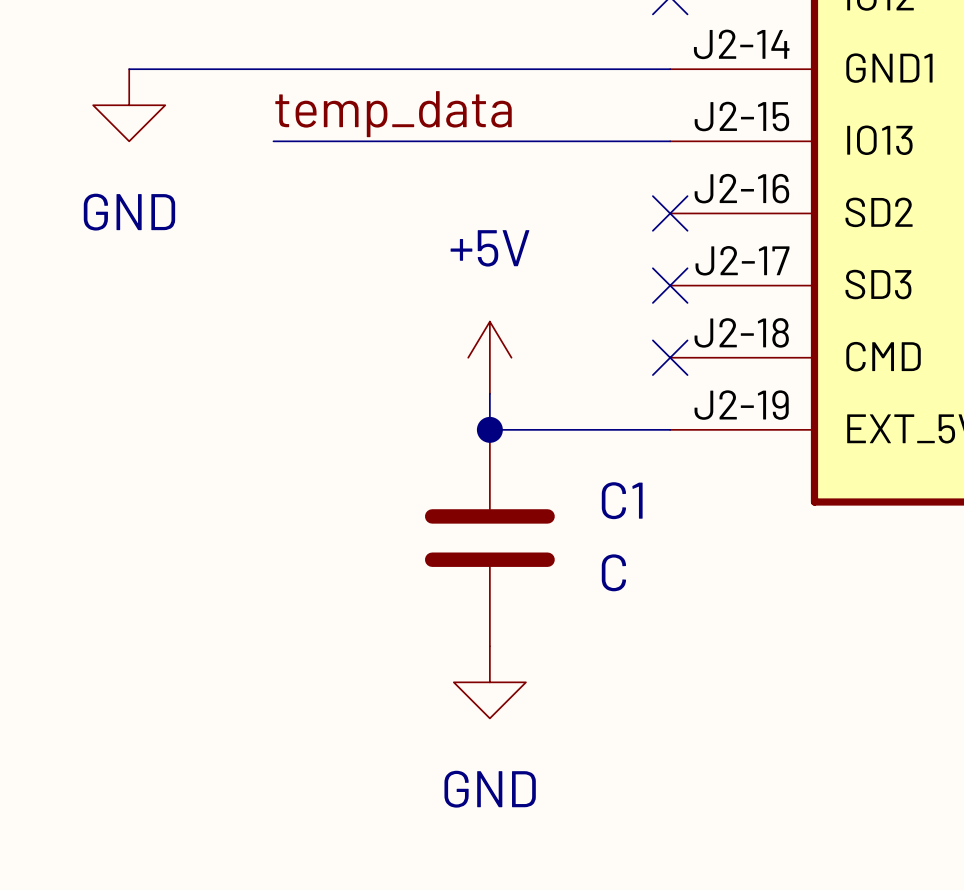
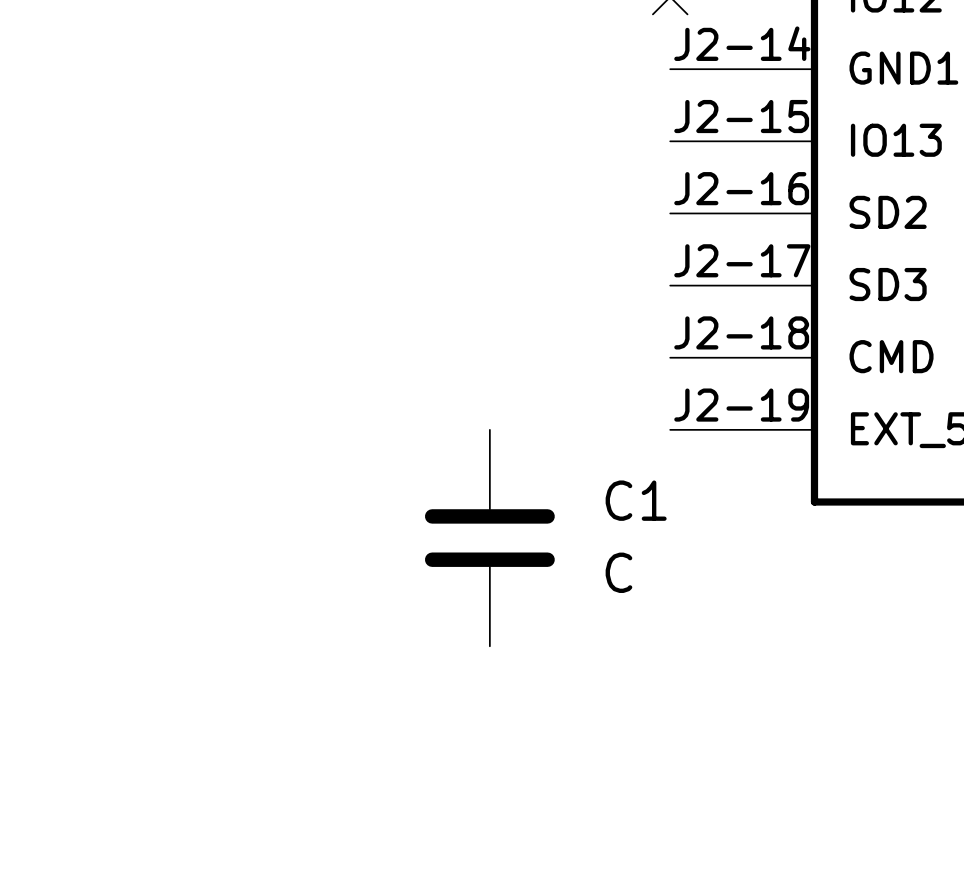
wire: (129, 69) (670, 69) -> none
power symbol: GND (129, 105) -> none
label: temp_data (393, 114) -> none
wire: (273, 141) (670, 141) -> none
no-connect mark: (670, 213) -> none
no-connect mark: (670, 285) -> none
power symbol: +5V (489, 357) -> none
no-connect mark: (670, 357) -> none
wire: (489, 393) (489, 429) (670, 429) -> none
junction: (489, 429) -> none
power symbol: GND (489, 682) -> none

